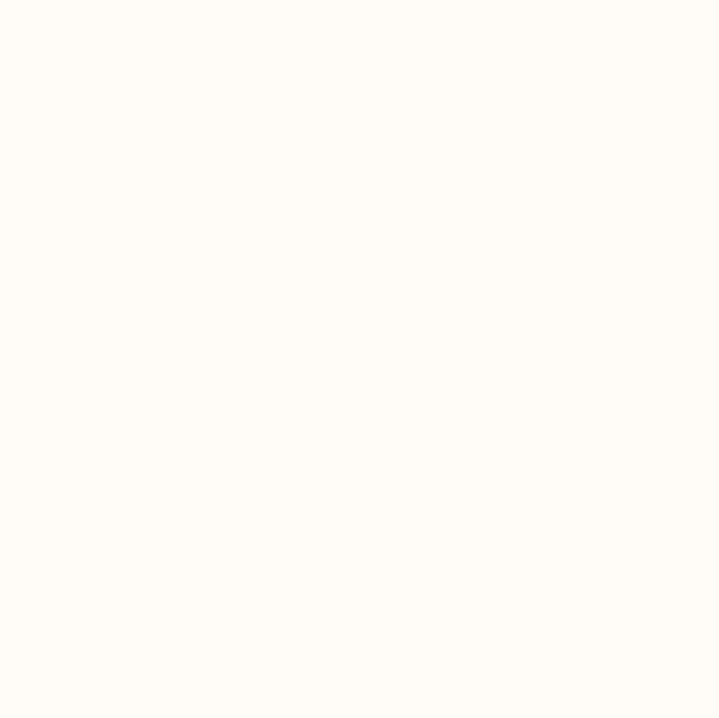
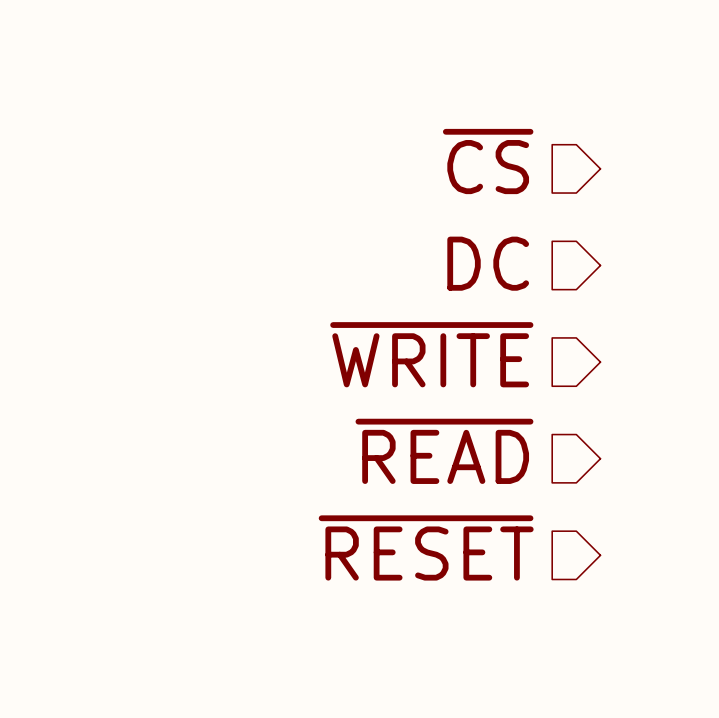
hierarchical label: none -> ~{CS} (488, 161)
hierarchical label: none -> DC (488, 263)
hierarchical label: none -> ~{WRITE} (431, 354)
hierarchical label: none -> ~{READ} (444, 451)
hierarchical label: none -> ~{RESET} (426, 547)

